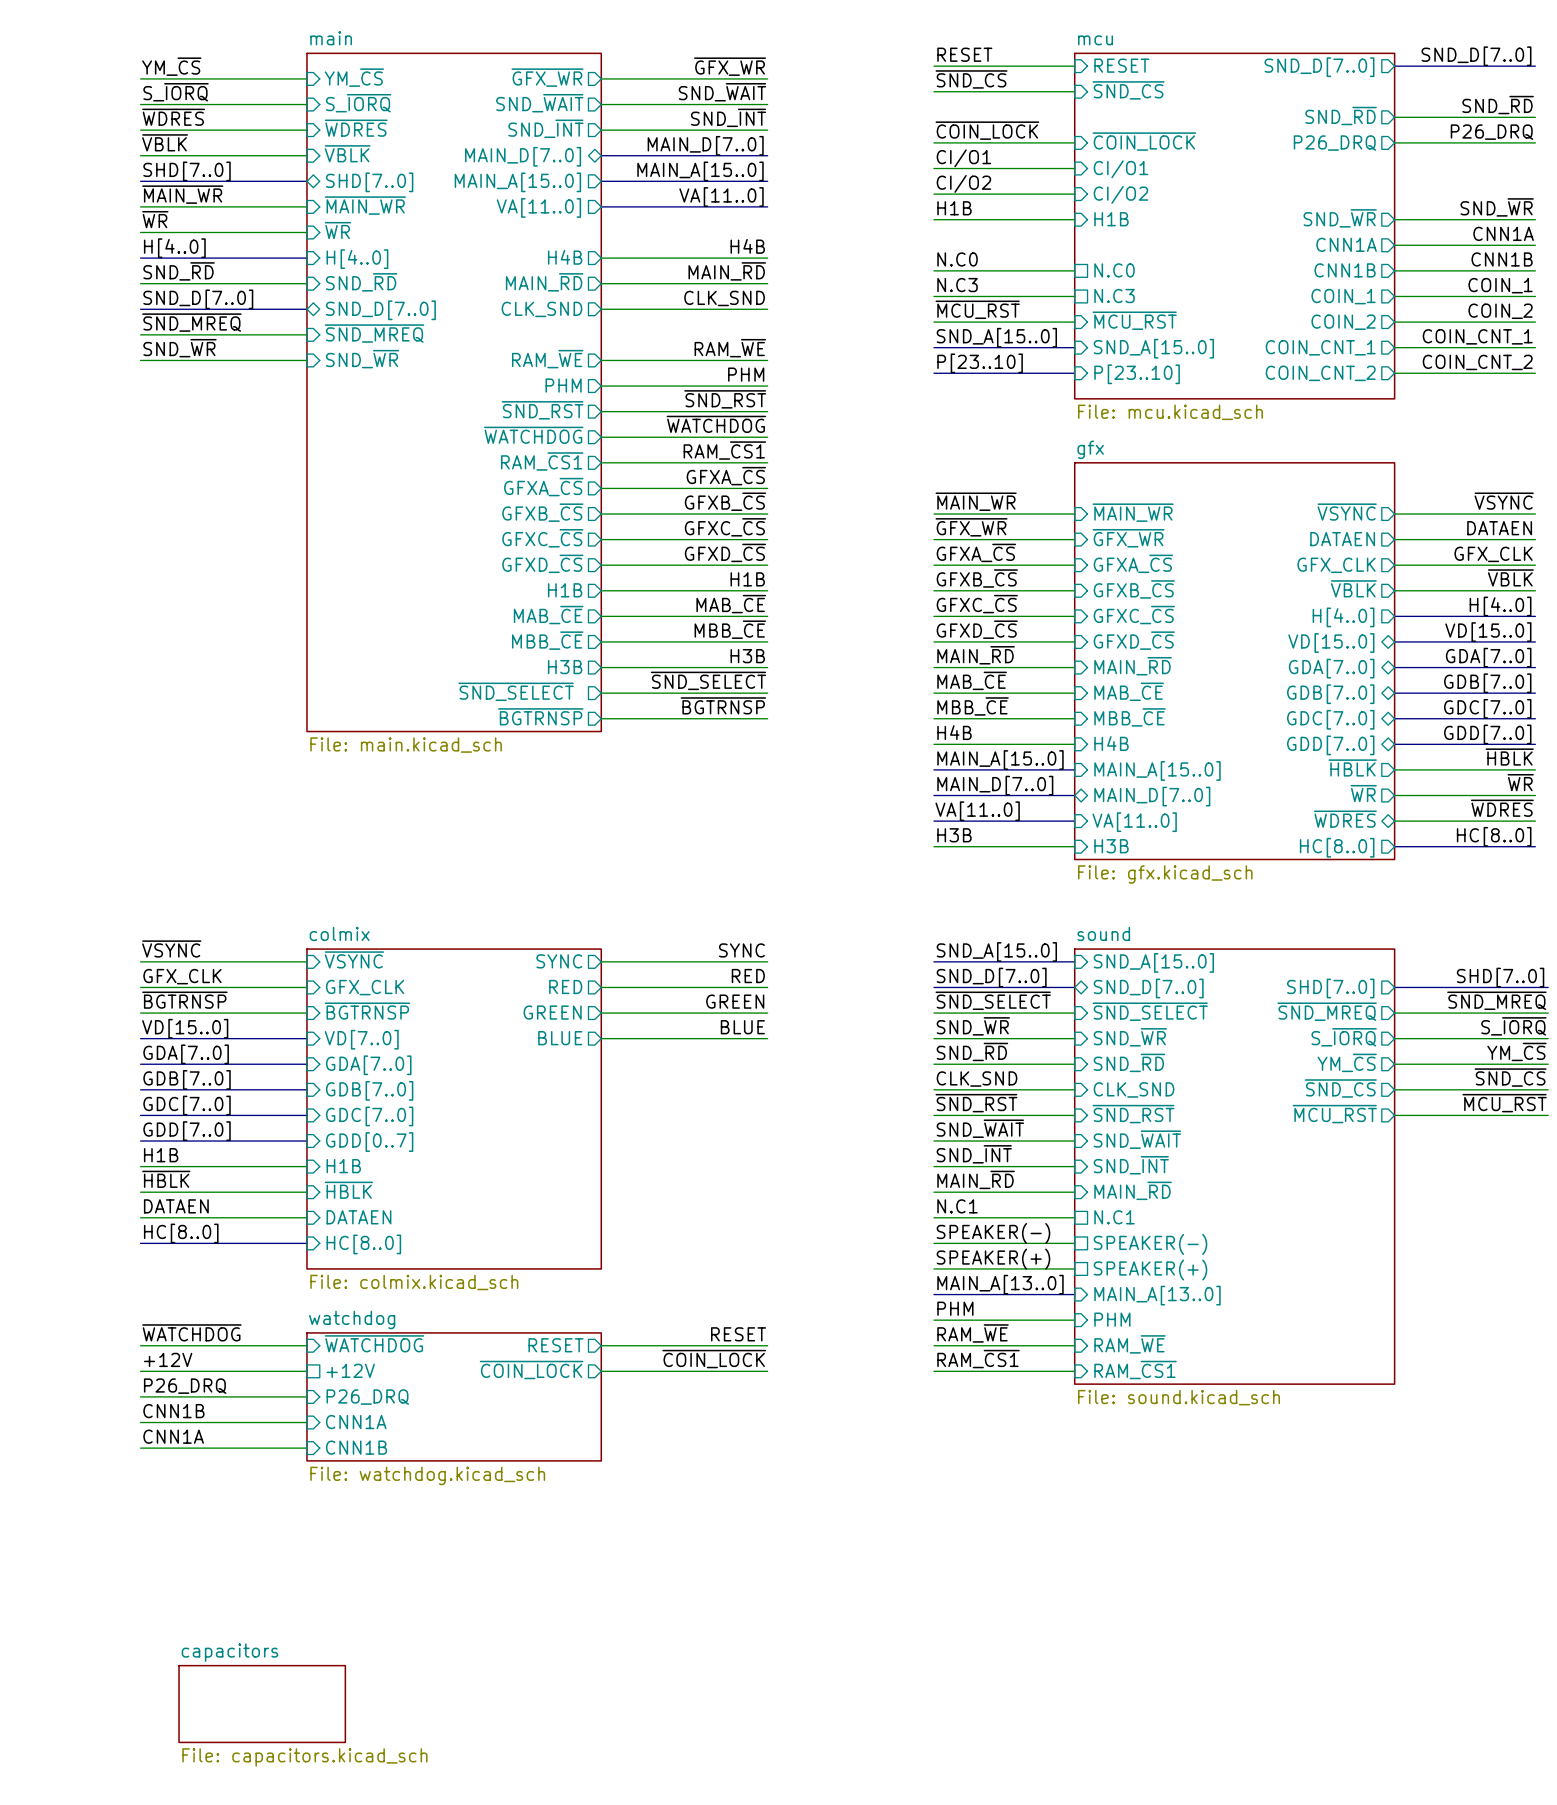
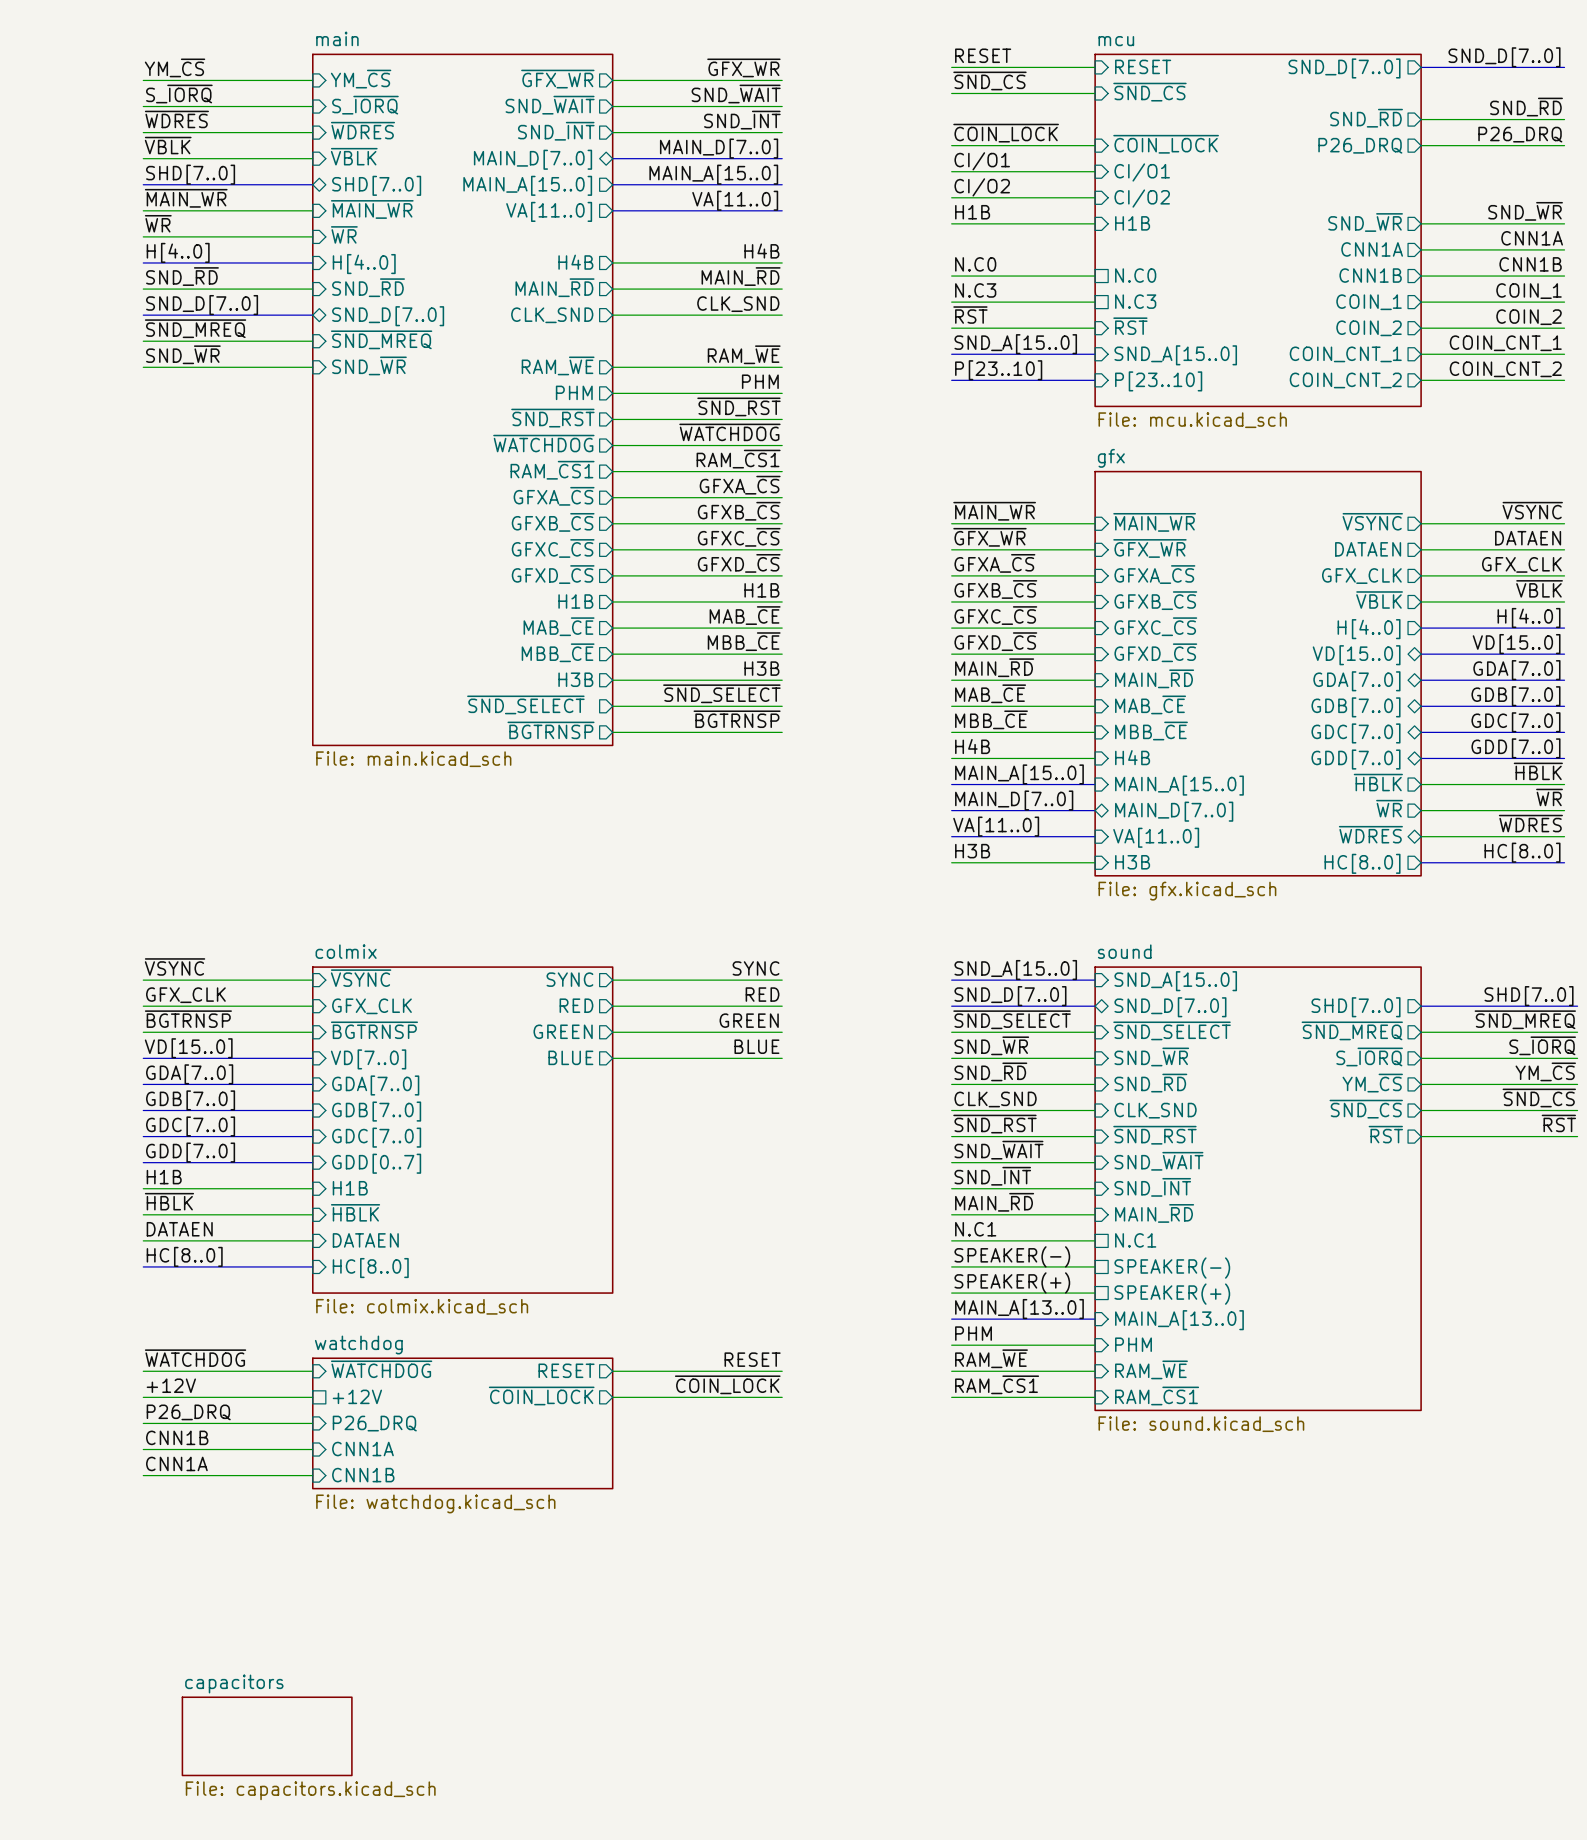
label: ~{MCU_RST} (977, 309) -> ~{RST} (970, 315)
sheet pin: ~{MCU_RST} (1134, 320) -> ~{RST} (1130, 326)
label: ~{MCU_RST} (1504, 1103) -> ~{RST} (1558, 1123)
sheet pin: ~{MCU_RST} (1334, 1114) -> ~{RST} (1385, 1134)

